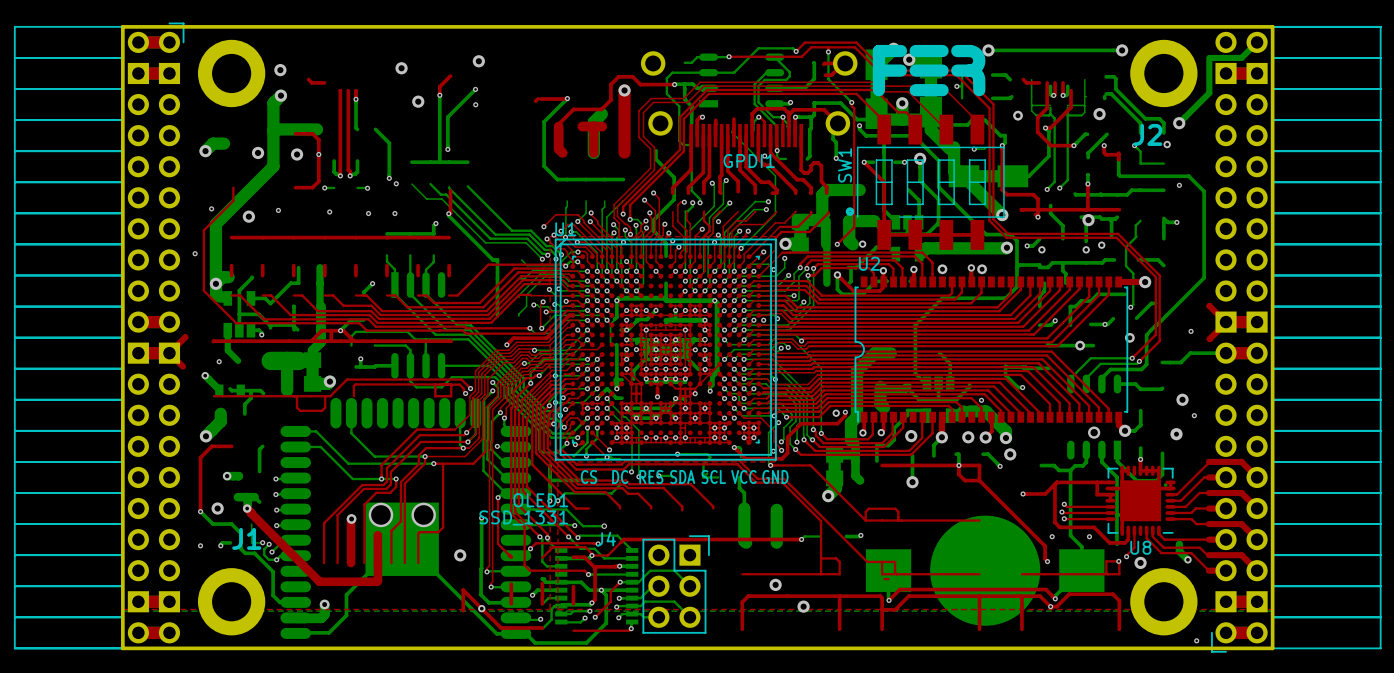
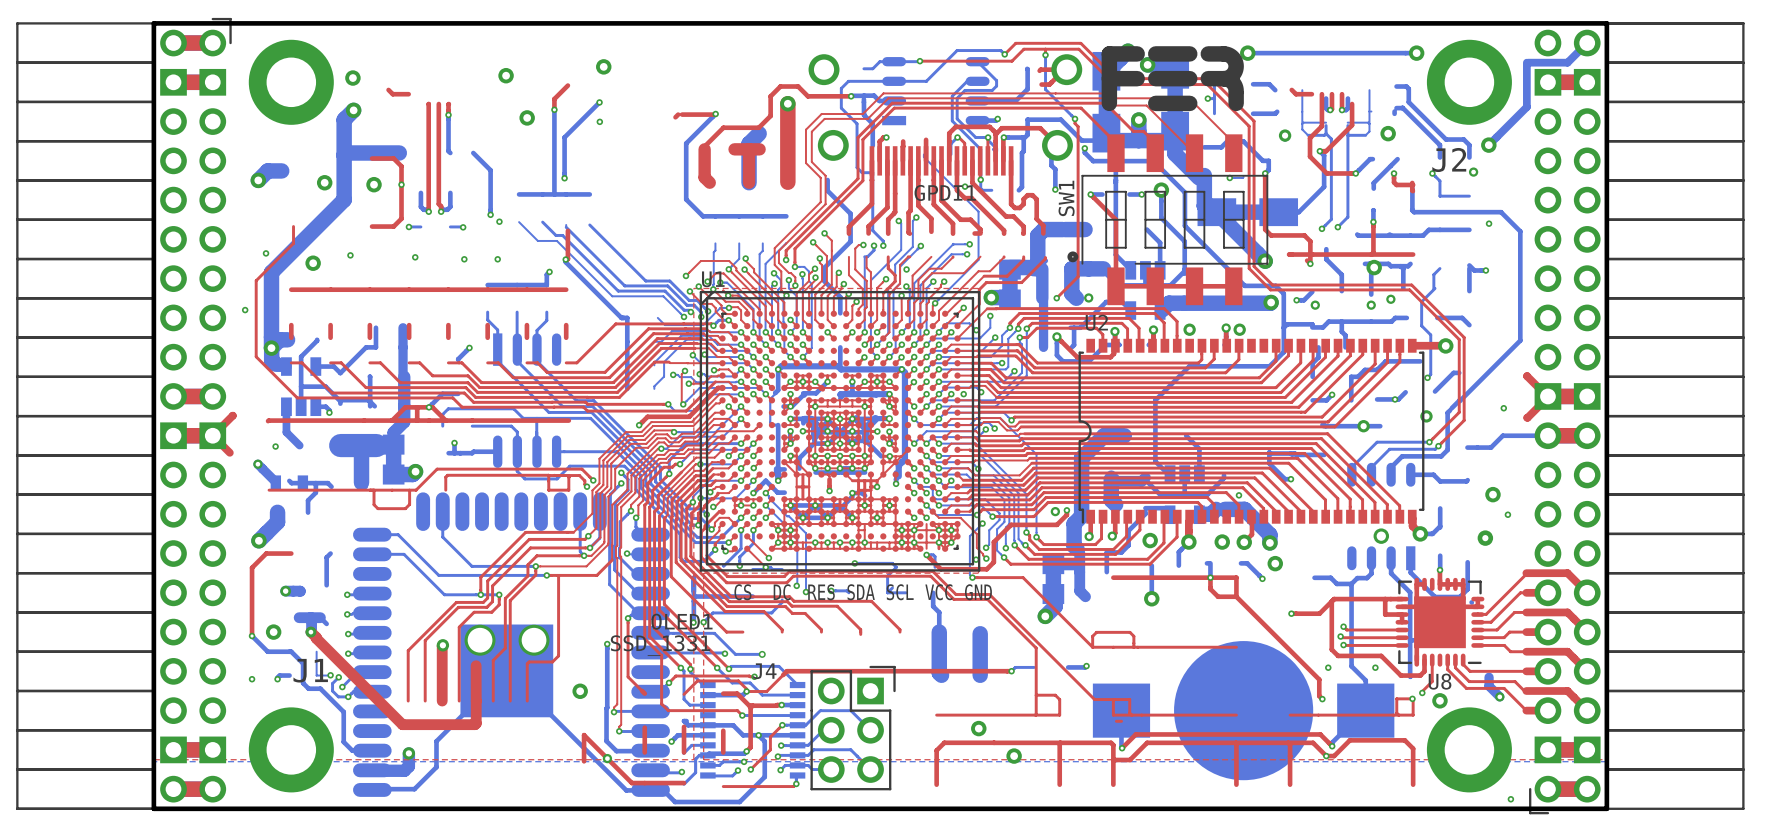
top track: none -> (926, 524) (926, 548)
top track: none -> (914, 530) (938, 530)
top track: none -> (914, 548) (914, 542) (938, 542) (938, 548)

